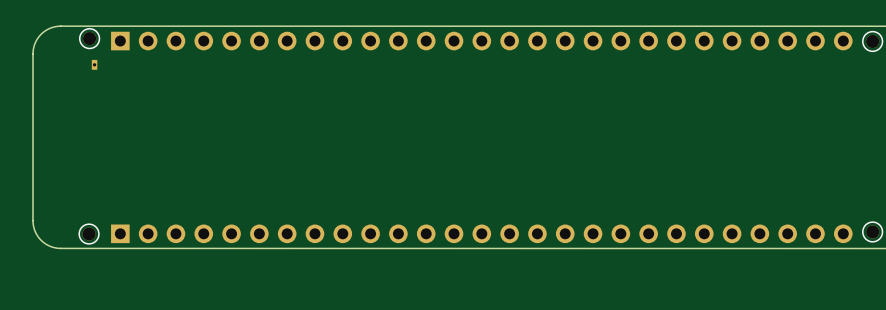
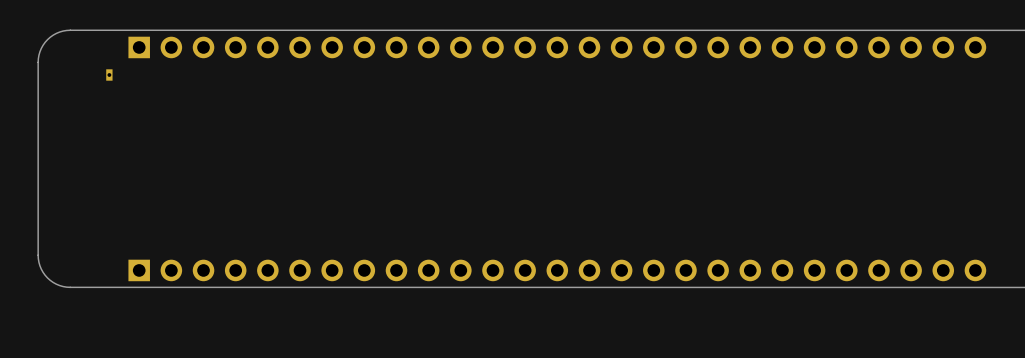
part: (89, 38) -> none
part: (872, 41) -> none
part: (872, 231) -> none
part: (89, 234) -> none

